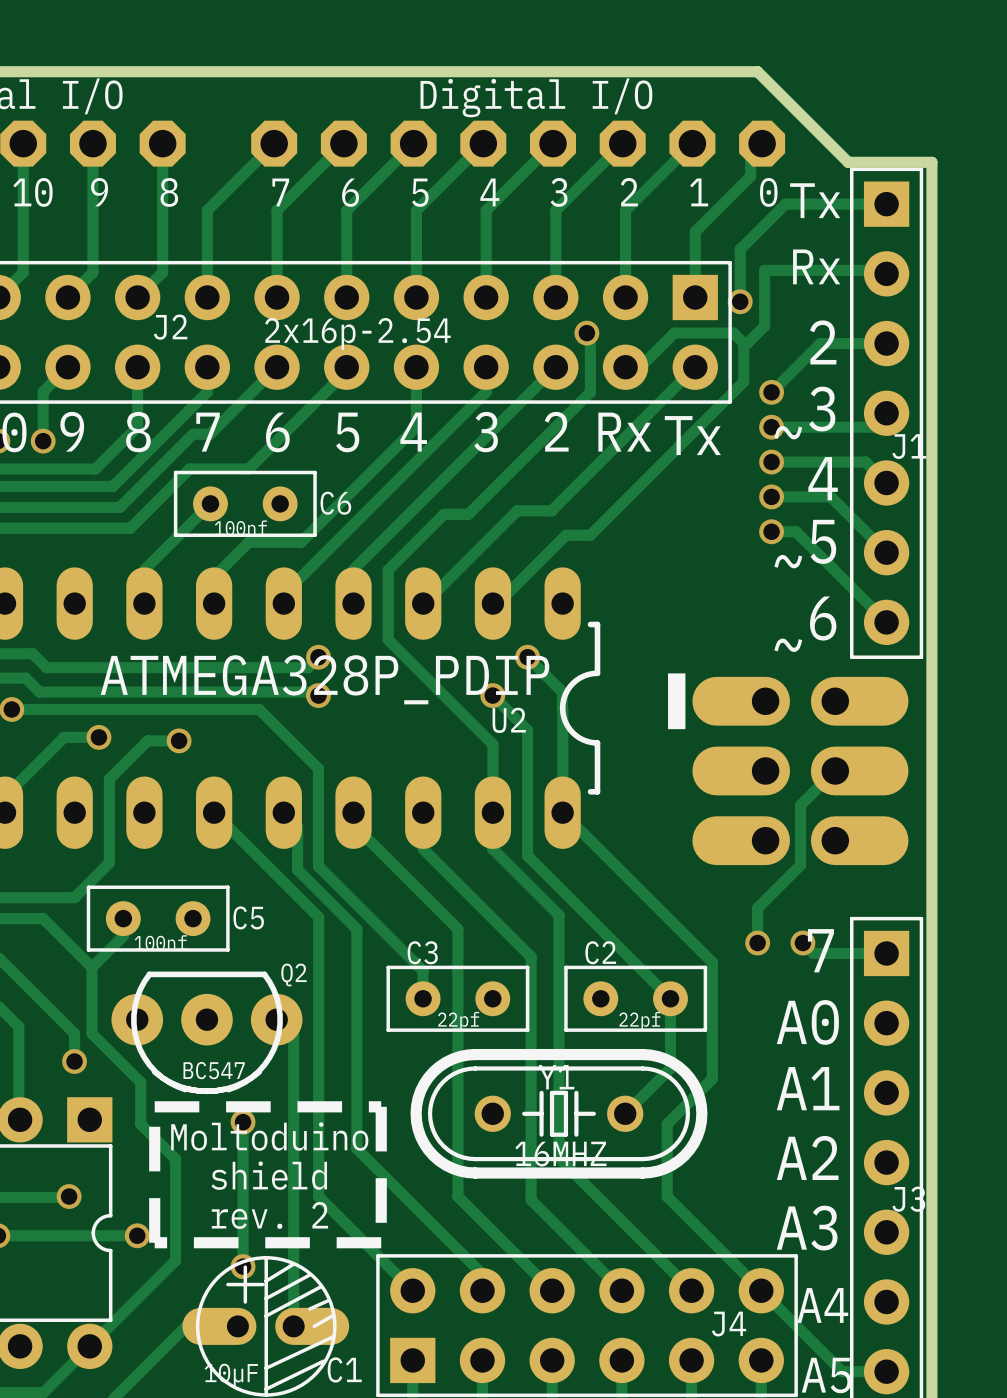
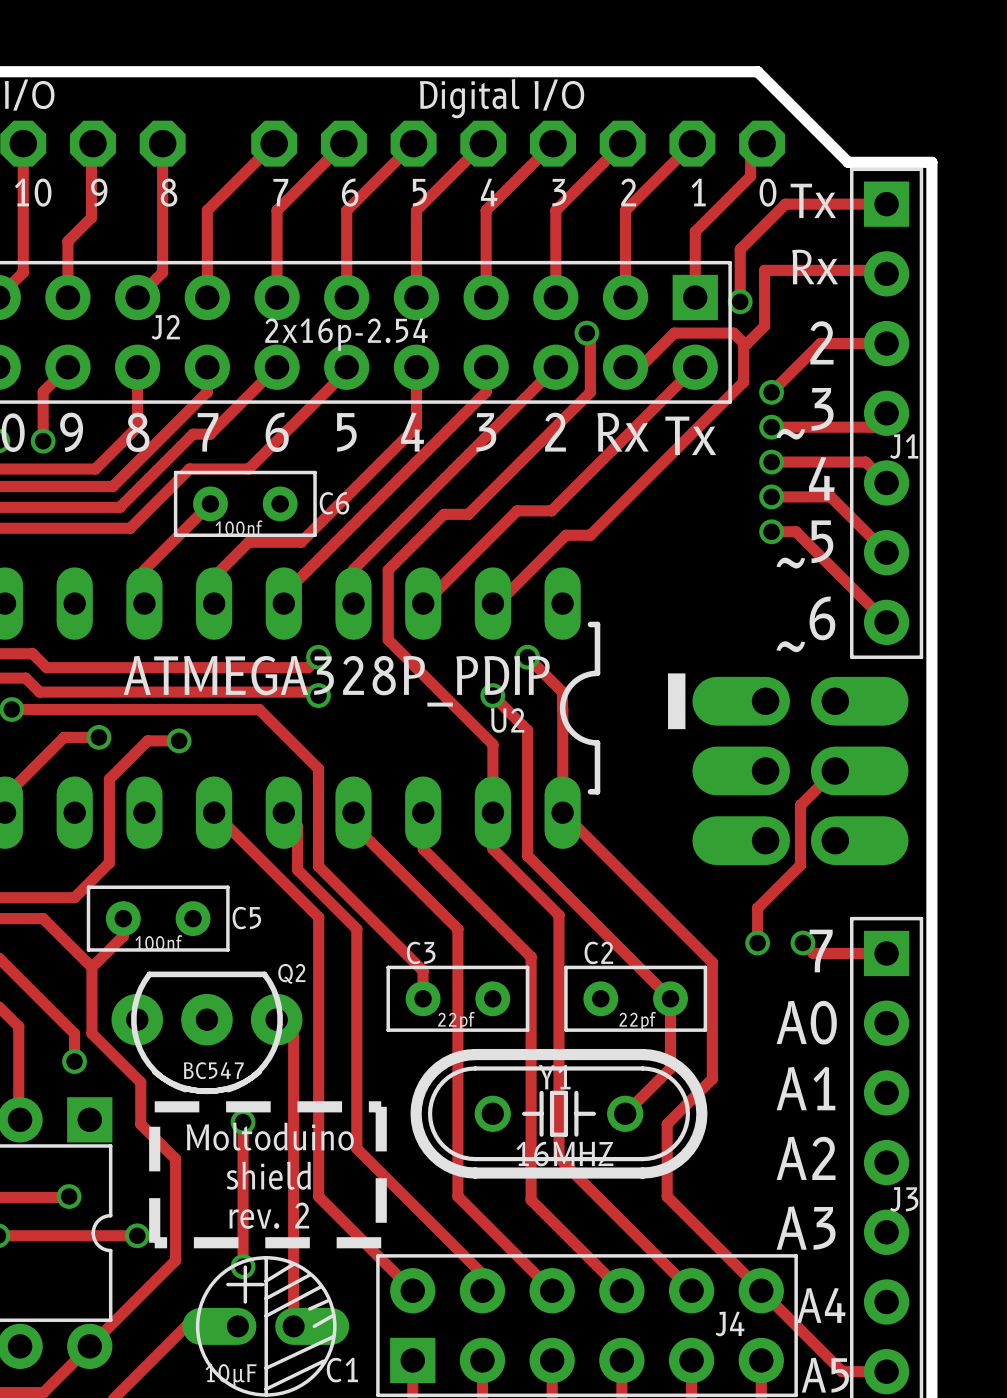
track: (92, 143) (92, 272) (67, 297) -> (92, 143) (91, 217) (67, 241) (67, 297)

